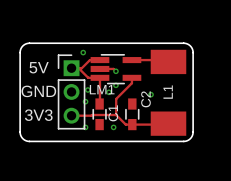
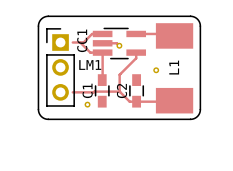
board edge: (48, 43) (27, 43) (22, 46) (20, 52) (20, 134) (27, 141) (48, 141) -> (48, 16) (41, 19) (38, 26) (38, 110) (41, 116) (48, 119)
part: (83, 52) -> none
text: 5V (39, 67) -> none
part: (115, 85) -> none
part: (87, 89) -> none
LM1 name position: LM1 (102, 89) -> LM1 (90, 65)
text: GND (38, 91) -> none
CC1: none -> (60, 67)
part: (71, 91) -> none
part: (108, 92) -> none
C2 name position: C2 (146, 99) -> C2 (122, 91)
part: (85, 101) -> none
C1 name position: C1 (113, 113) -> C1 (87, 90)
text: 3V3 (38, 115) -> none
part: (113, 127) -> none

